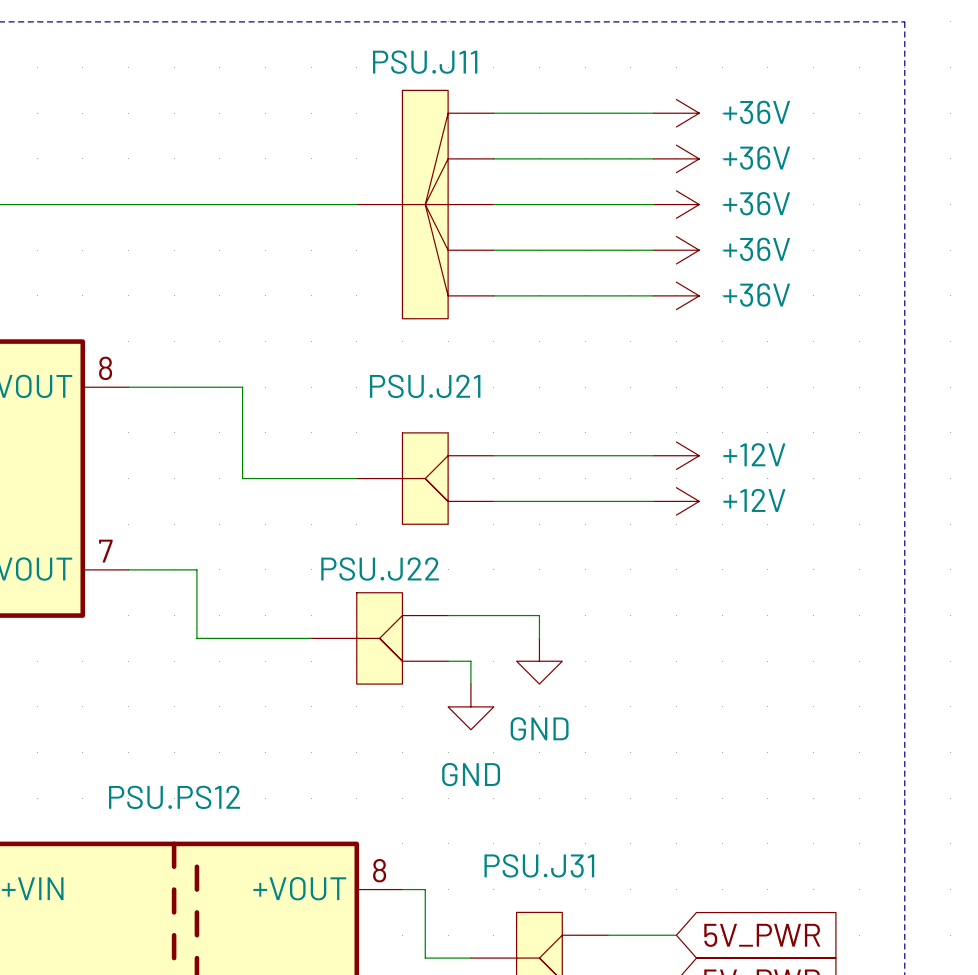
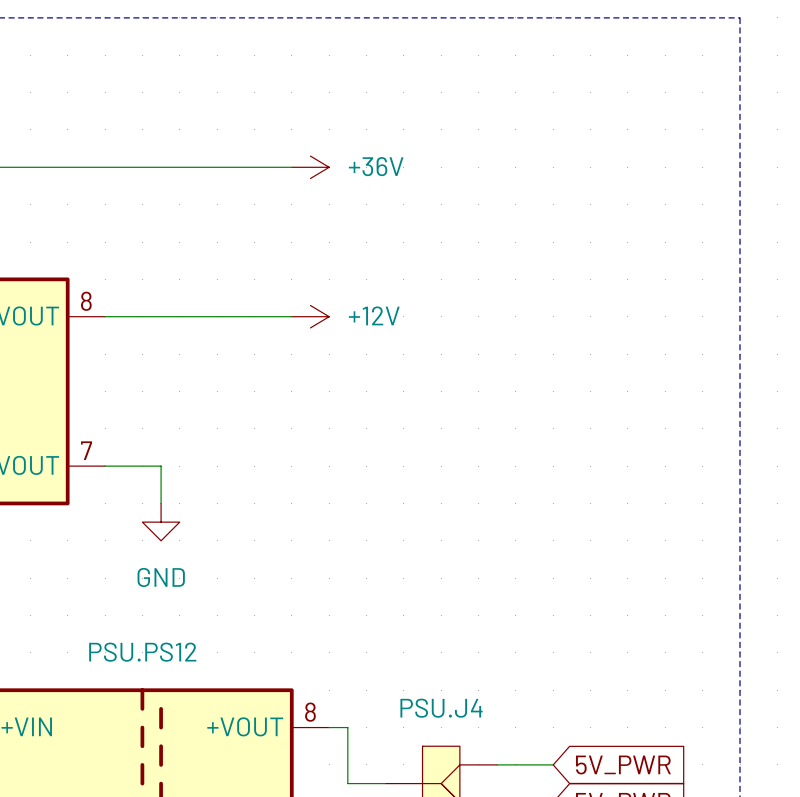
wire: (493, 113) (653, 113) -> none
power symbol: +36V (676, 113) -> none
wire: (493, 158) (653, 158) -> none
power symbol: +36V (676, 158) -> none
power symbol: none -> +36V (310, 167)
PSU.J11: (425, 204) -> none
wire: (493, 204) (653, 204) -> none
power symbol: +36V (676, 204) -> none
wire: (493, 250) (653, 250) -> none
power symbol: +36V (676, 250) -> none
wire: (493, 295) (653, 295) -> none
power symbol: +36V (676, 295) -> none
wire: (242, 387) (242, 478) (356, 478) -> (198, 316) (291, 316)
power symbol: none -> +12V (310, 316)
wire: (493, 455) (653, 455) -> none
power symbol: +12V (676, 455) -> none
PSU.J21: (425, 478) -> none
wire: (493, 501) (653, 501) -> none
power symbol: +12V (676, 501) -> none
wire: (196, 615) (196, 638) (311, 638) -> none
wire: (448, 615) (539, 615) (539, 638) -> none
power symbol: none -> GND (161, 522)
PSU.J22: (379, 638) -> none
wire: (448, 661) (470, 661) (470, 684) -> none
power symbol: GND (539, 661) -> none
power symbol: GND (470, 706) -> none
PSU.J31 name: PSU.J31 (539, 865) -> PSU.J4 (441, 708)

